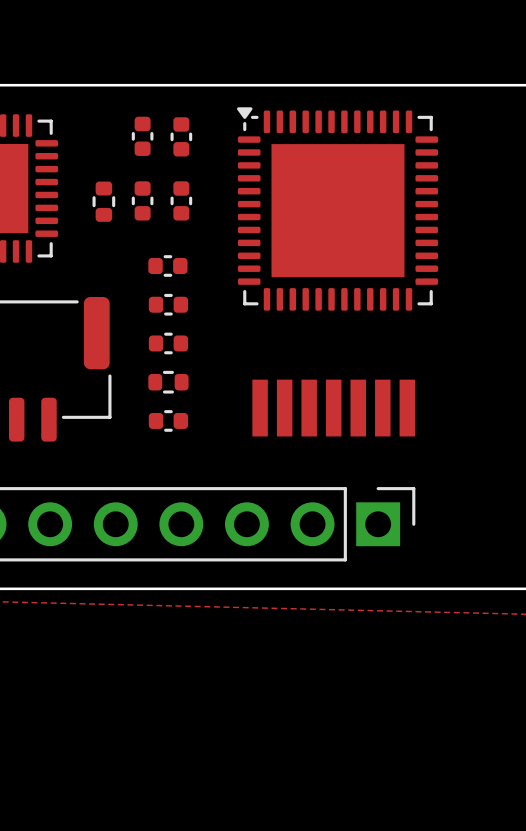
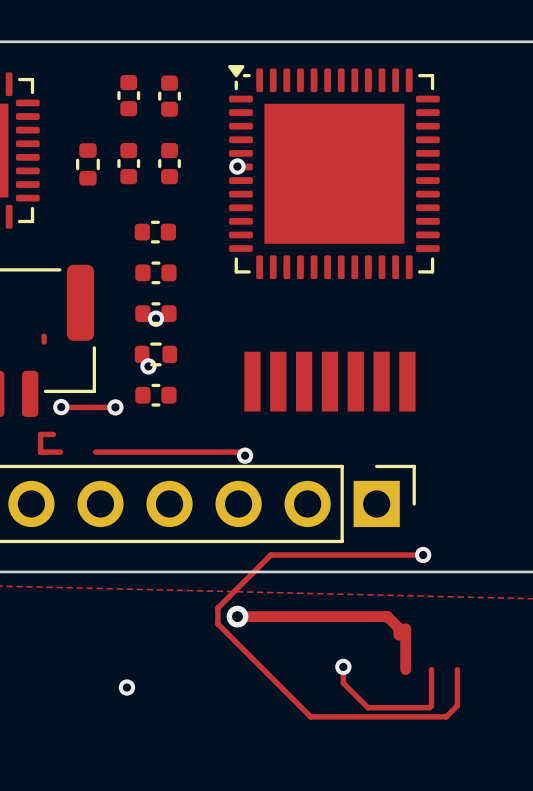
via: none -> (237, 166)
via: none -> (156, 318)
track: none -> (44, 336) (44, 342)
via: none -> (148, 366)
track: none -> (61, 407) (115, 407)
via: none -> (61, 407)
via: none -> (115, 407)
track: none -> (40, 434) (53, 434)
track: none -> (40, 434) (40, 452) (60, 452)
track: none -> (95, 452) (241, 452) (245, 455)
via: none -> (245, 455)
track: none -> (423, 555) (270, 555) (217, 607) (217, 624) (310, 716) (446, 716) (457, 705) (457, 669)
via: none -> (423, 555)
track: none -> (237, 616) (387, 616) (398, 628) (398, 635)
via: none -> (237, 616)
track: none -> (405, 628) (405, 669)
track: none -> (343, 666) (343, 683) (367, 707) (429, 707) (431, 705) (431, 669)
via: none -> (343, 666)
via: none -> (126, 687)

